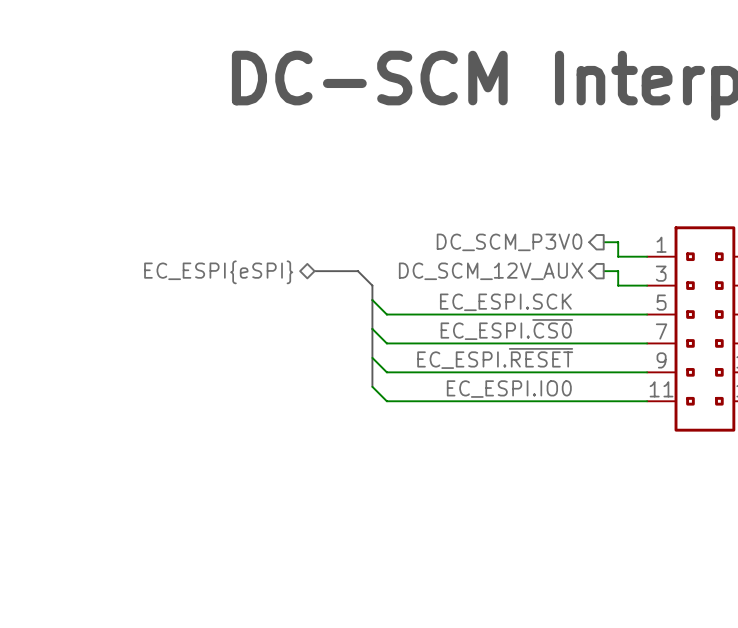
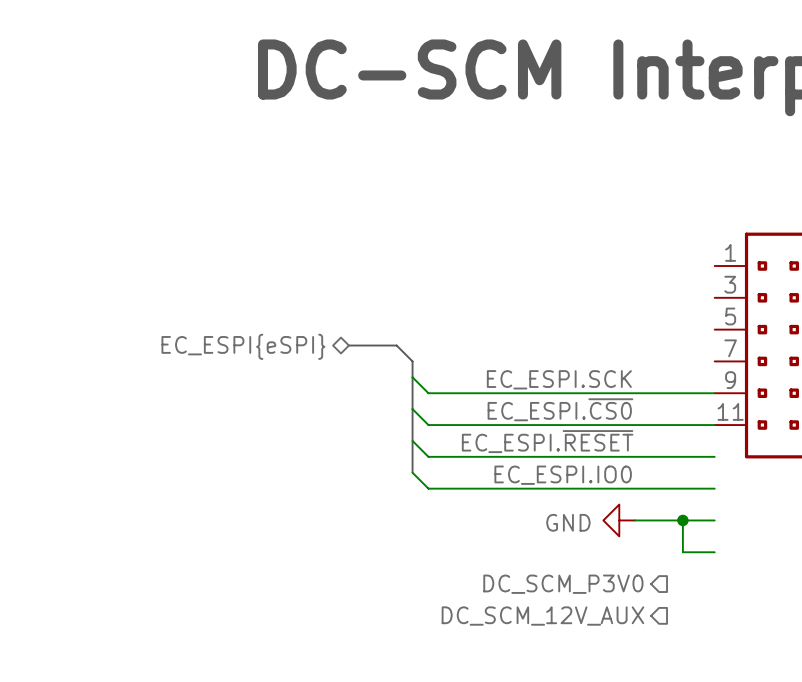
hierarchical label: DC_SCM_P3V0 (509, 242) -> none
wire: (603, 242) (618, 242) (618, 256) (647, 256) -> none
bus: (314, 271) (357, 271) (372, 285) (372, 343) -> (348, 345) (396, 345) (412, 361)
hierarchical label: DC_SCM_12V_AUX (490, 271) -> none
wire: (603, 271) (618, 271) (618, 285) (647, 285) -> none
hierarchical label position: EC_ESPI{eSPI} (218, 272) -> EC_ESPI{eSPI} (243, 346)
wire: (372, 300) (386, 314) (647, 314) -> (412, 440) (428, 456) (714, 456)
label: EC_ESPI.SCK (505, 302) -> none
wire: (372, 328) (386, 343) (647, 343) -> (412, 472) (428, 488) (714, 488)
label: EC_ESPI.~{CS0} (506, 329) -> none
label: EC_ESPI.~{RESET} (495, 358) -> EC_ESPI.SCK (559, 379)
bus: none -> (412, 409) (412, 472)
label: EC_ESPI.IO0 (509, 389) -> EC_ESPI.~{CS0} (560, 409)
label: none -> EC_ESPI.~{RESET} (547, 441)
label: none -> EC_ESPI.IO0 (563, 475)
power symbol: none -> GND (619, 520)
wire: none -> (635, 520) (714, 520)
wire: none -> (682, 520) (682, 552) (714, 552)
junction: none -> (682, 520)
hierarchical label: none -> DC_SCM_P3V0 (563, 584)
hierarchical label: none -> DC_SCM_12V_AUX (542, 616)

